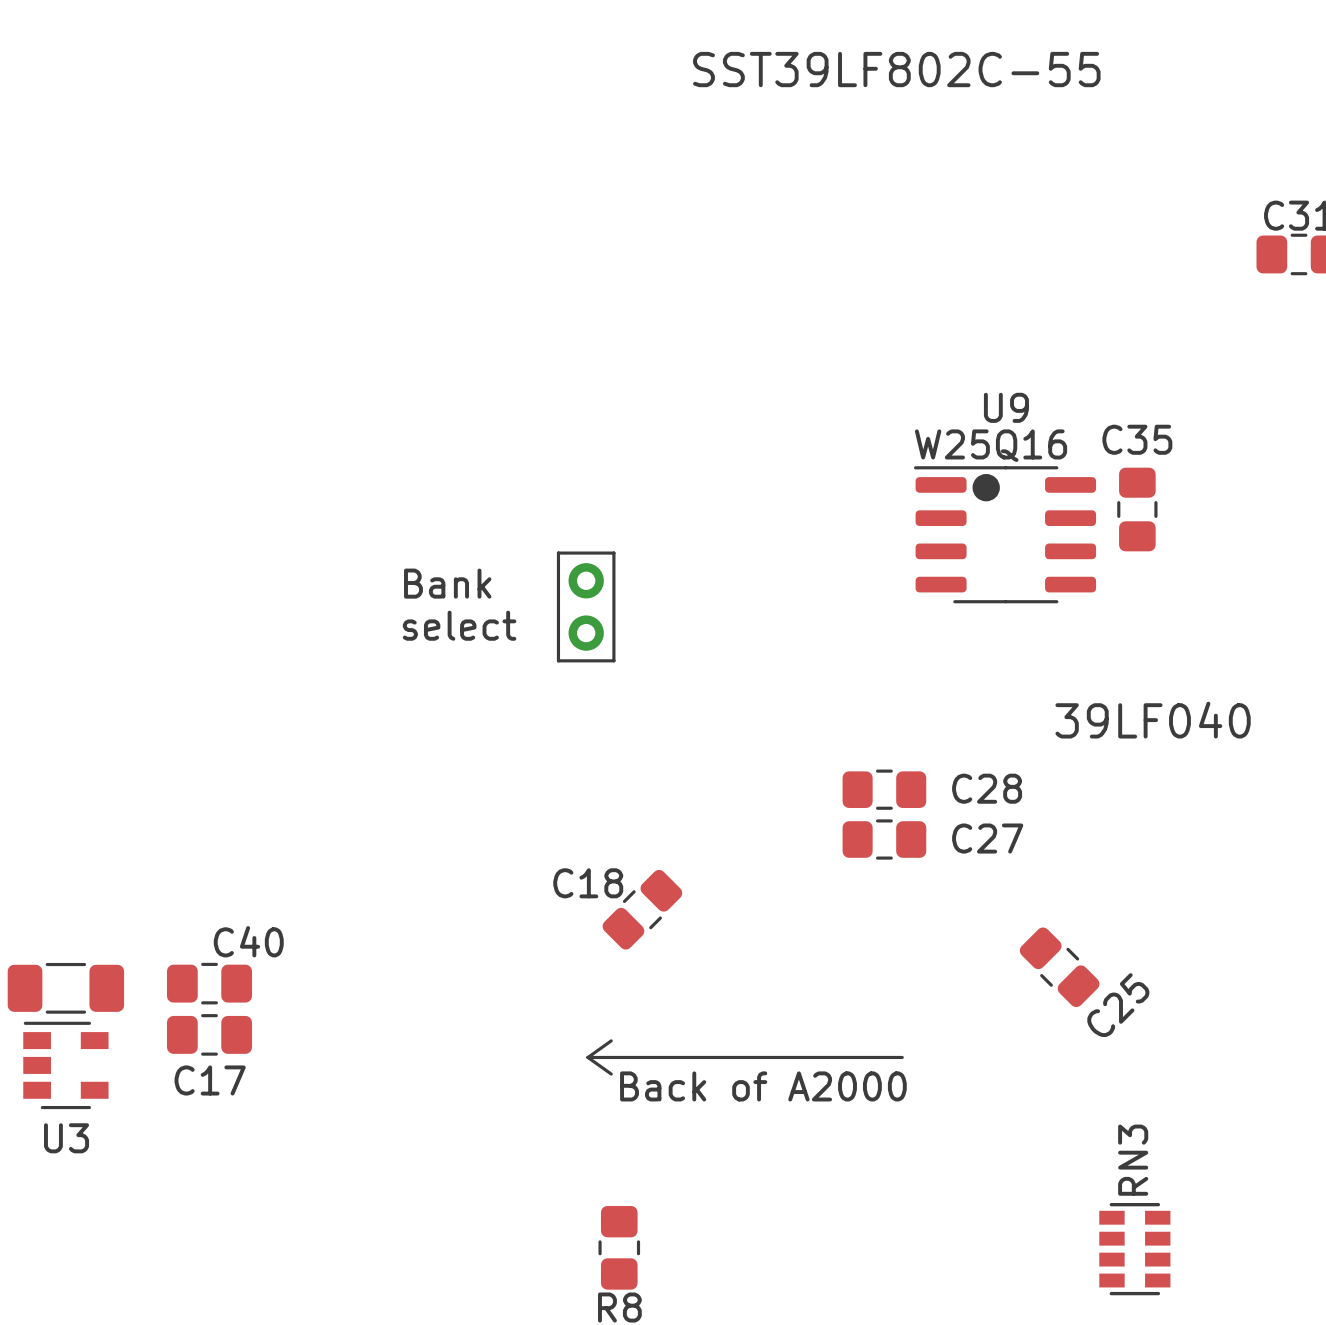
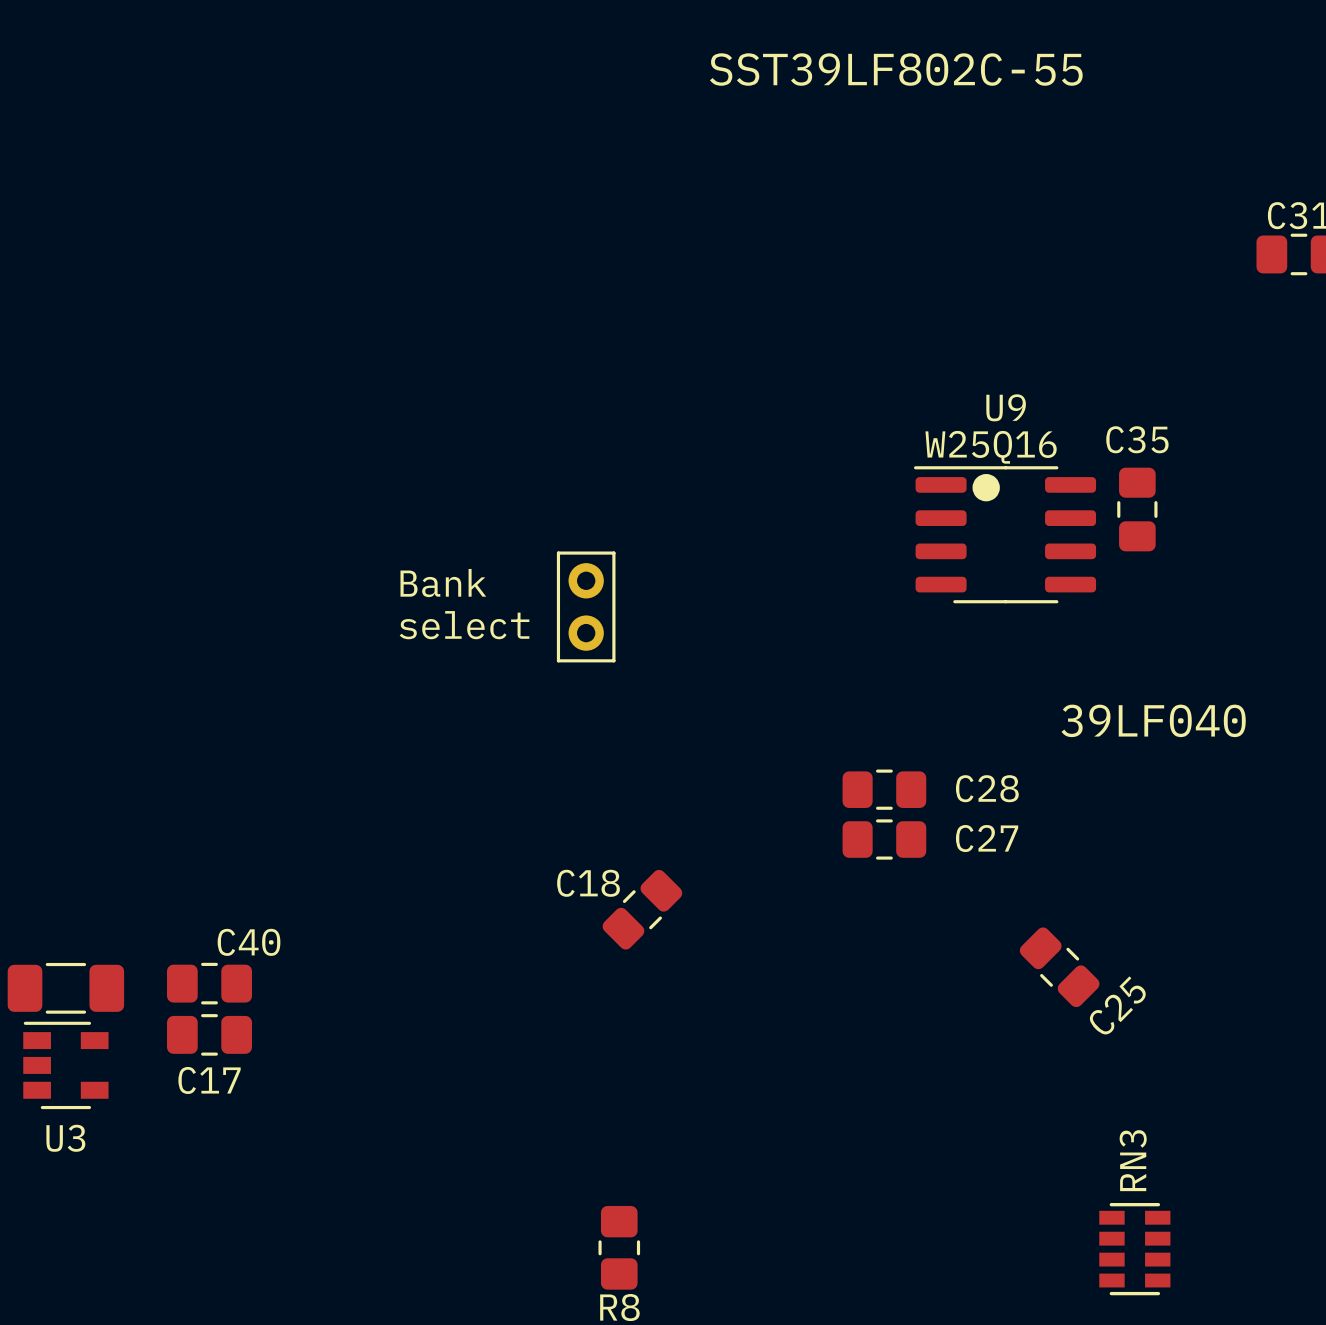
line: (611, 1040) (587, 1057) -> none
line: (587, 1057) (611, 1074) -> none
line: (587, 1057) (902, 1057) -> none
text: Back of A2000 (763, 1086) -> none

